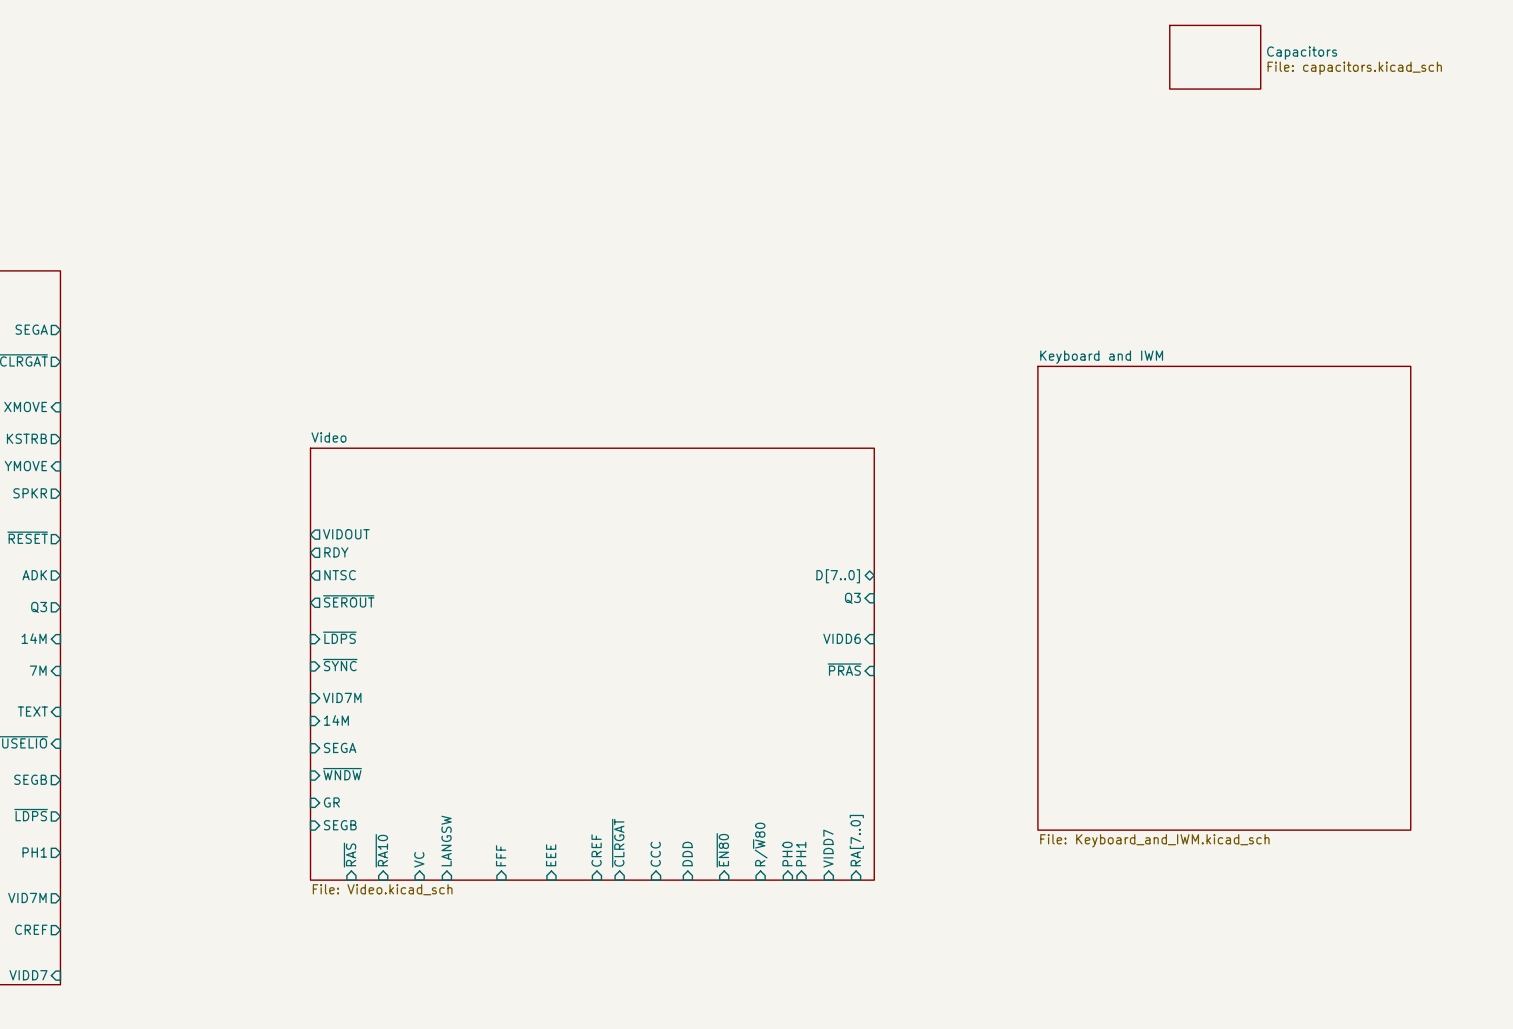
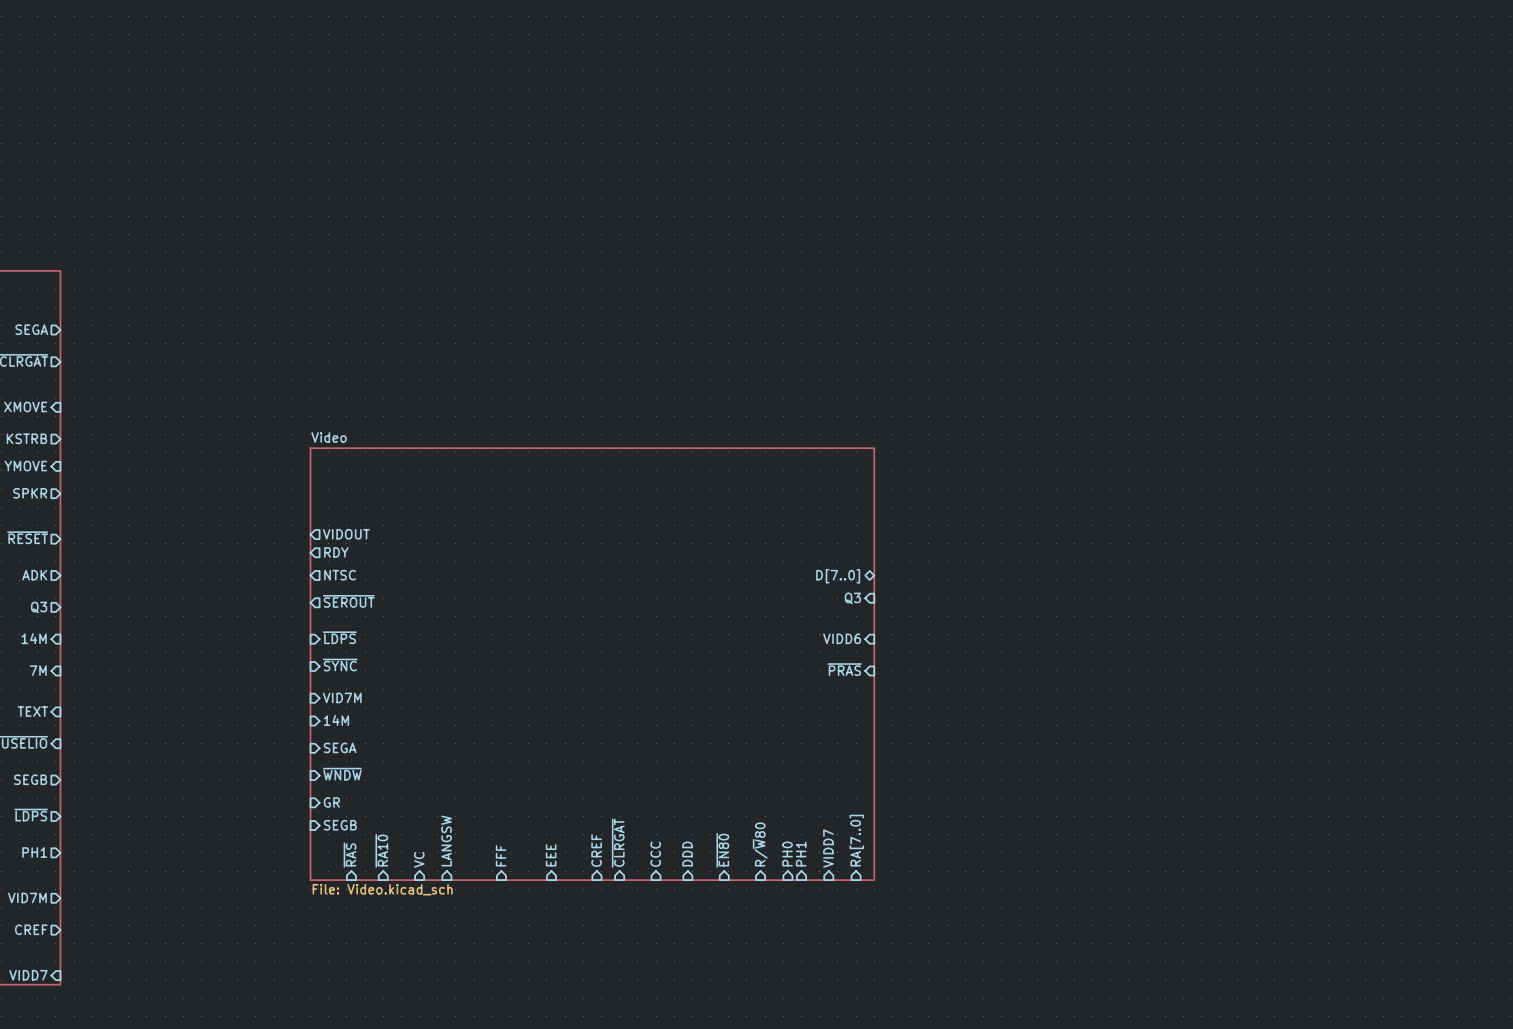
sheet Capacitors: File: capacitors.kicad_sch (1215, 57) -> none
sheet Keyboard and IWM: File: Keyboard_and_IWM.kicad_sch (1224, 598) -> none

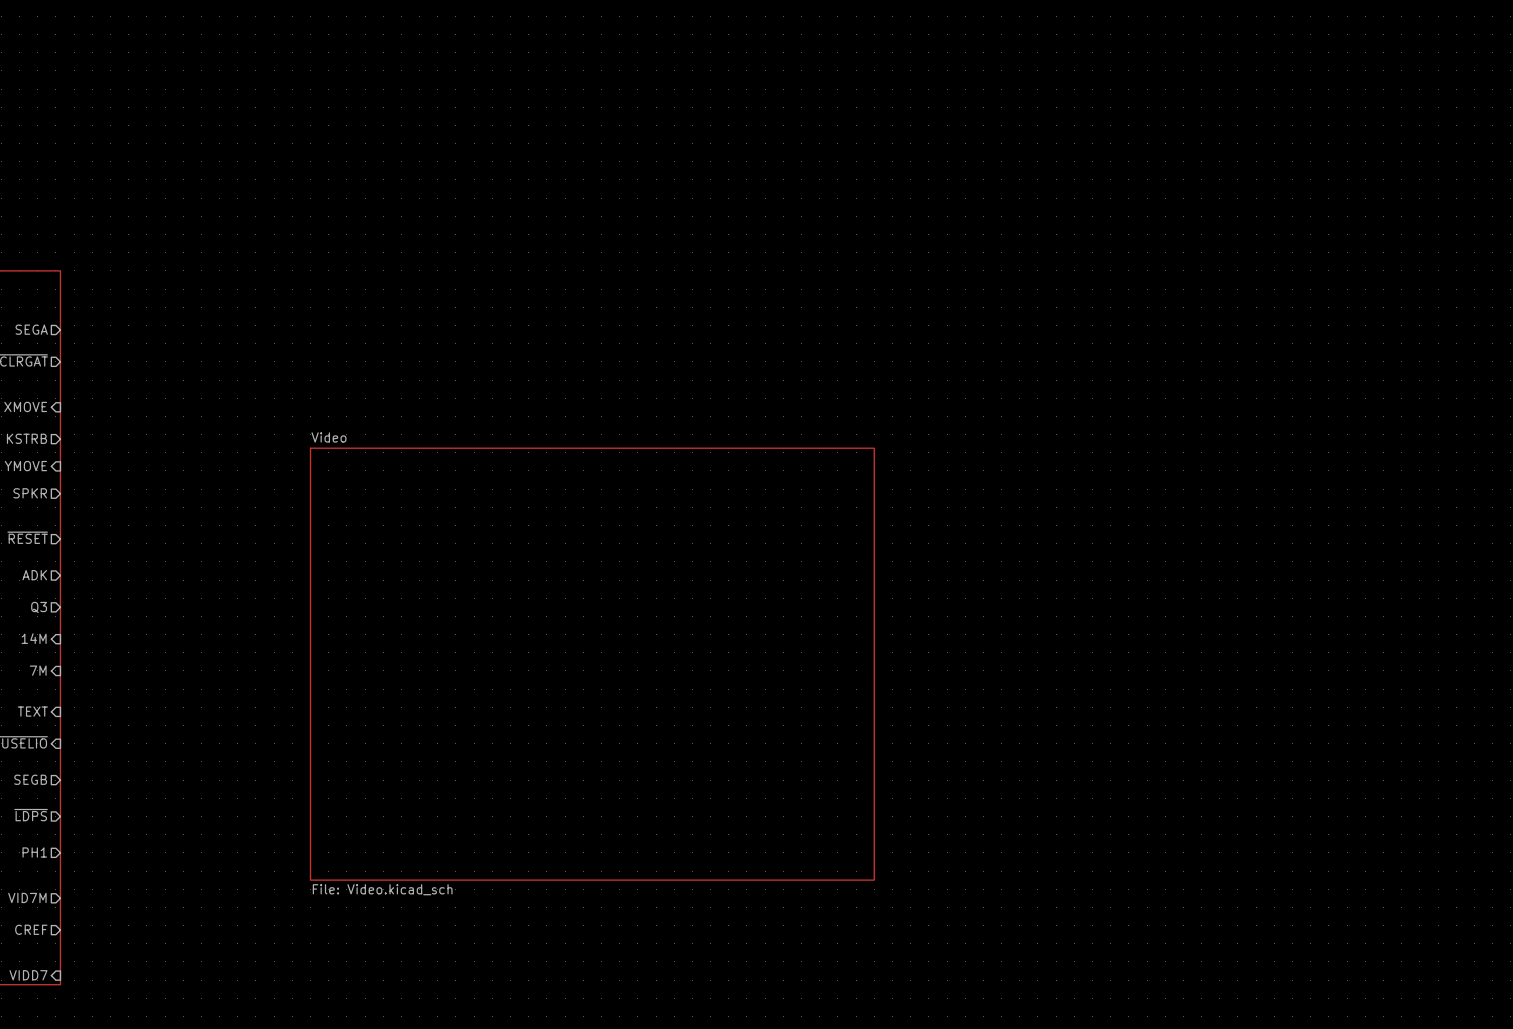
sheet pin: VIDOUT (346, 534) -> none
sheet pin: RDY (336, 552) -> none
sheet pin: NTSC (340, 575) -> none
sheet pin: D[7..0] (838, 576) -> none
sheet pin: Q3 (852, 598) -> none
sheet pin: ~{SEROUT} (348, 601) -> none
sheet pin: ~{LDPS} (339, 637) -> none
sheet pin: VIDD6 (842, 638) -> none
sheet pin: ~{SYNC} (340, 665) -> none
sheet pin: ~{PRAS} (844, 669) -> none
sheet pin: VID7M (342, 697) -> none
sheet pin: 14M (336, 720) -> none
sheet pin: SEGA (340, 747) -> none
sheet pin: ~{WNDW} (342, 774) -> none
sheet pin: GR (331, 802) -> none
sheet pin: SEGB (340, 825) -> none
sheet pin: RA[7..0] (856, 840) -> none
sheet pin: LANGSW (446, 841) -> none
sheet pin: ~{CLRGAT} (618, 843) -> none
sheet pin: R/~{W}80 (760, 844) -> none
sheet pin: VIDD7 (828, 848) -> none
sheet pin: ~{RA10} (381, 850) -> none
sheet pin: CREF (596, 850) -> none
sheet pin: ~{EN80} (722, 850) -> none
sheet pin: CCC (655, 854) -> none
sheet pin: DDD (687, 854) -> none
sheet pin: PH0 (787, 854) -> none
sheet pin: PH1 (801, 854) -> none
sheet pin: ~{RAS} (350, 855) -> none
sheet pin: FFF (501, 855) -> none
sheet pin: EEE (551, 855) -> none
sheet pin: VC (419, 859) -> none

